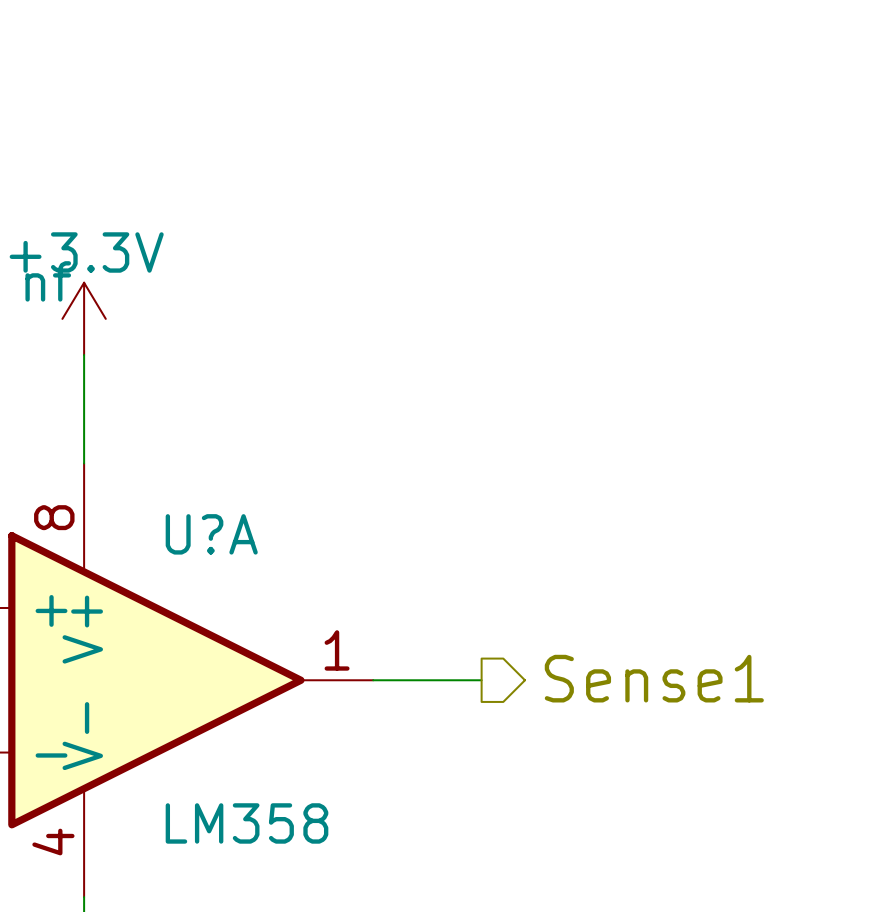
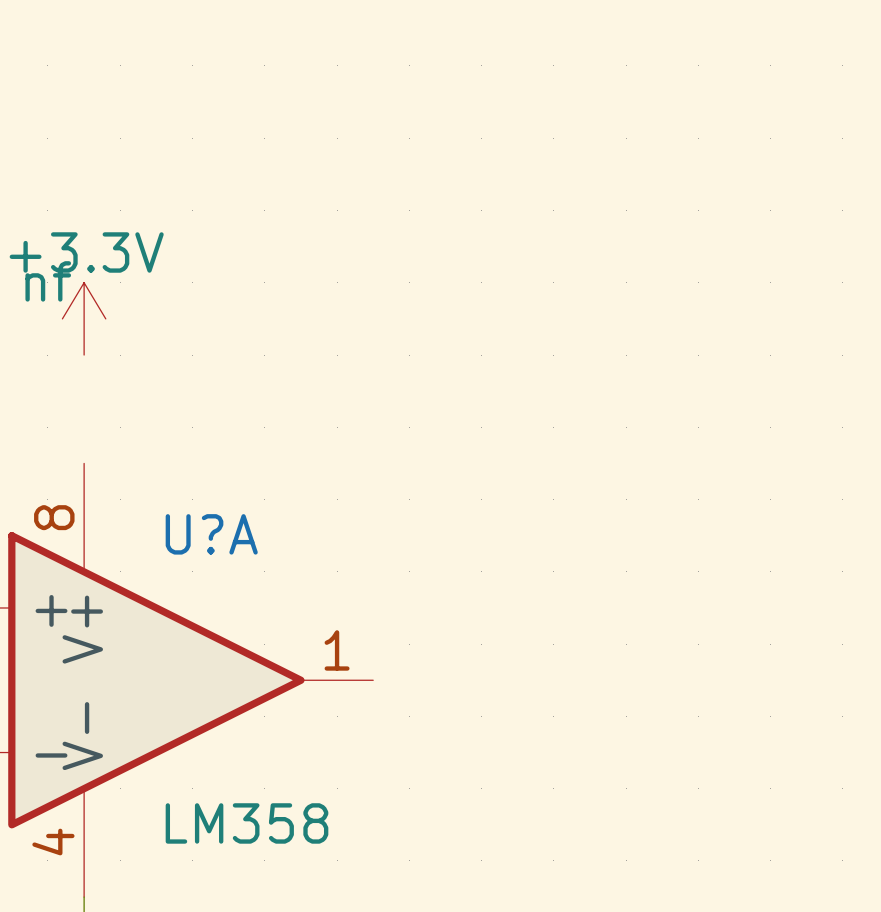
wire: (84, 355) (84, 463) -> none
hierarchical label: Sense1 (654, 678) -> none
wire: (373, 680) (481, 680) -> none

